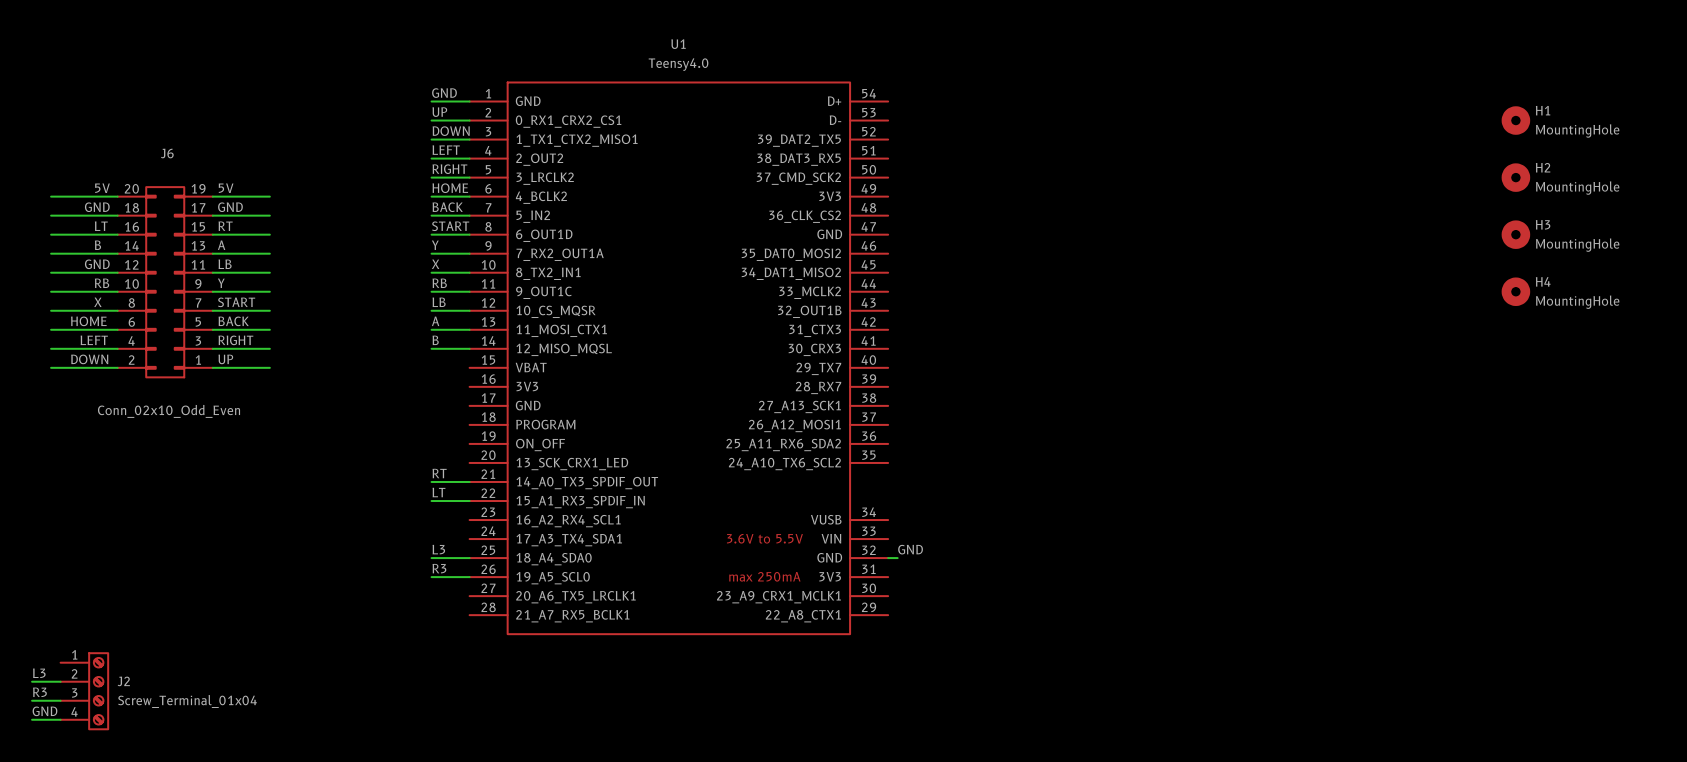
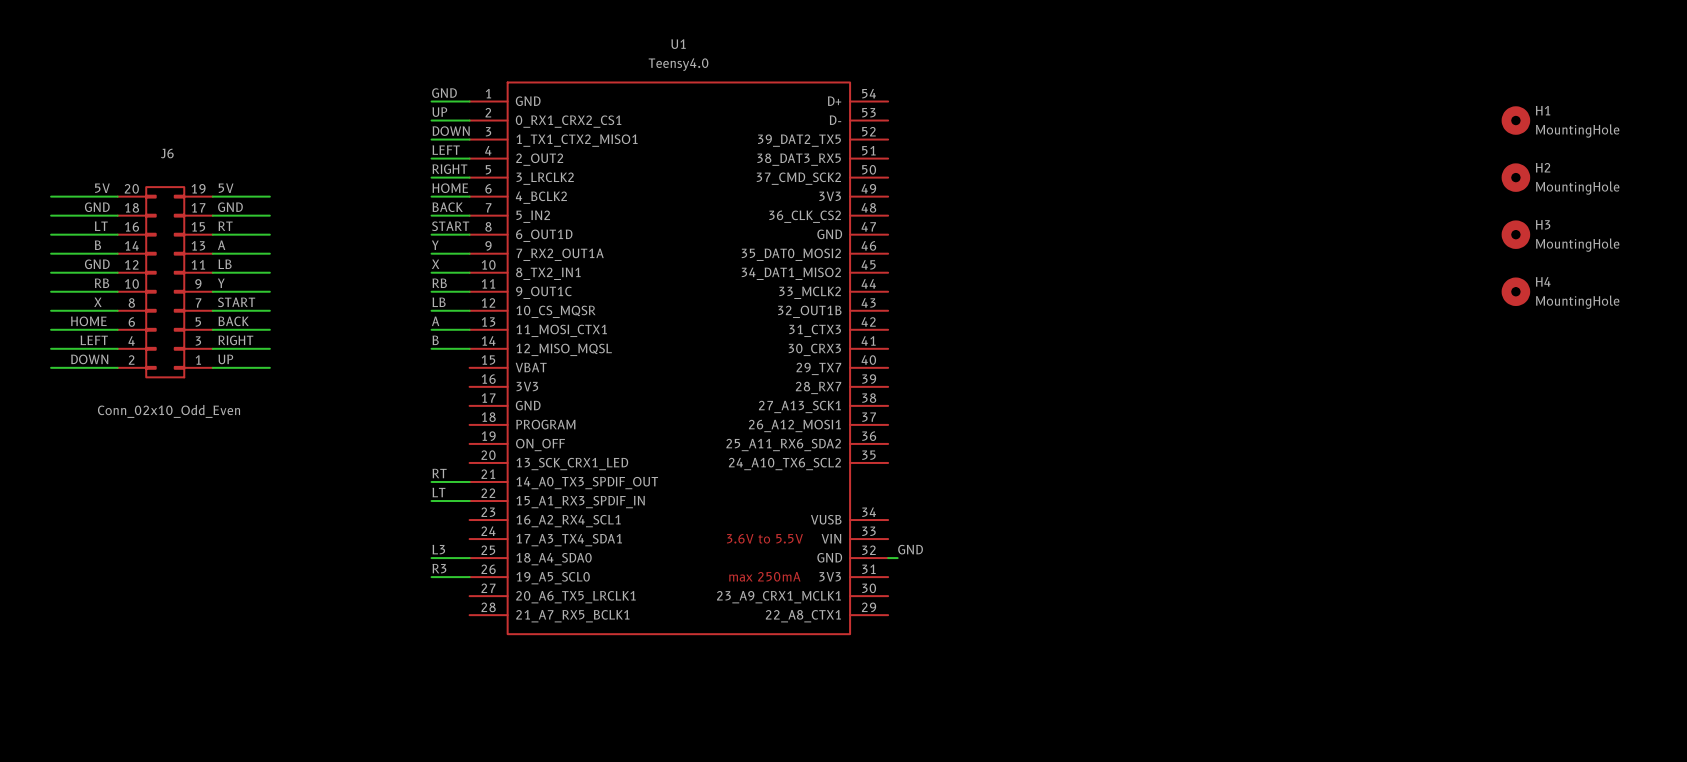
label: L3 (39, 673) -> none
wire: (32, 681) (60, 681) -> none
J2: Screw_Terminal_01x04 (84, 691) -> none
label: R3 (39, 692) -> none
wire: (32, 700) (60, 700) -> none
label: GND (44, 711) -> none
wire: (32, 719) (60, 719) -> none

